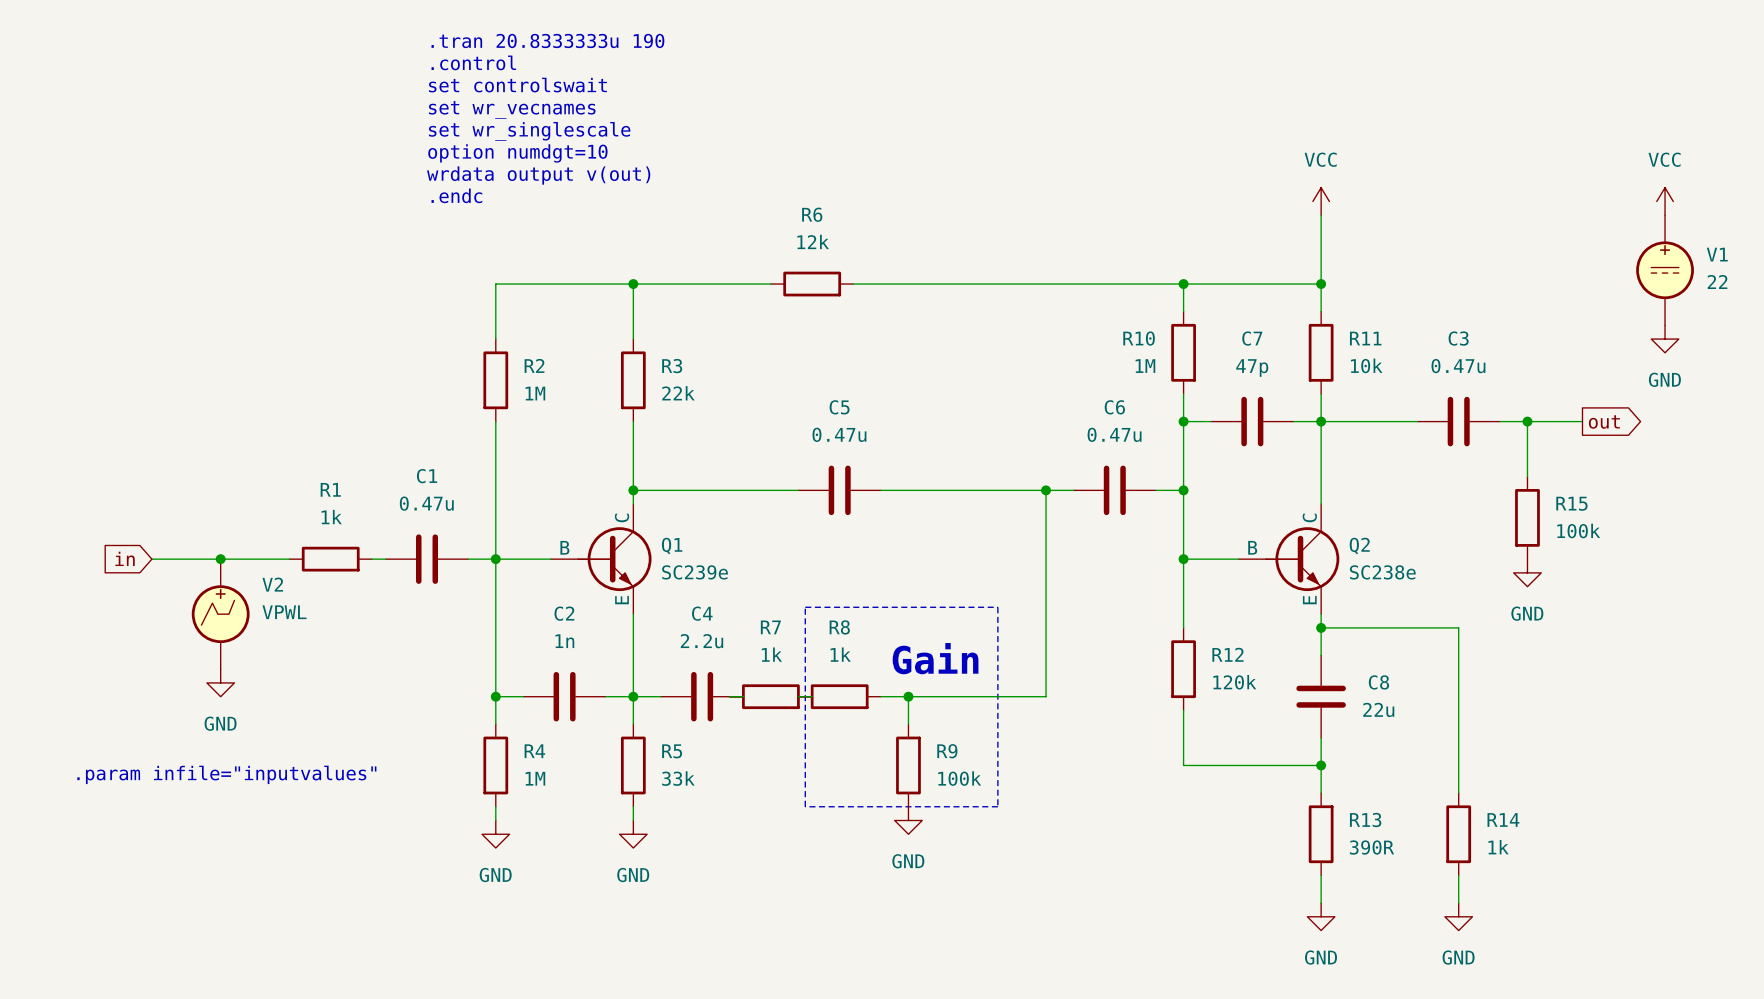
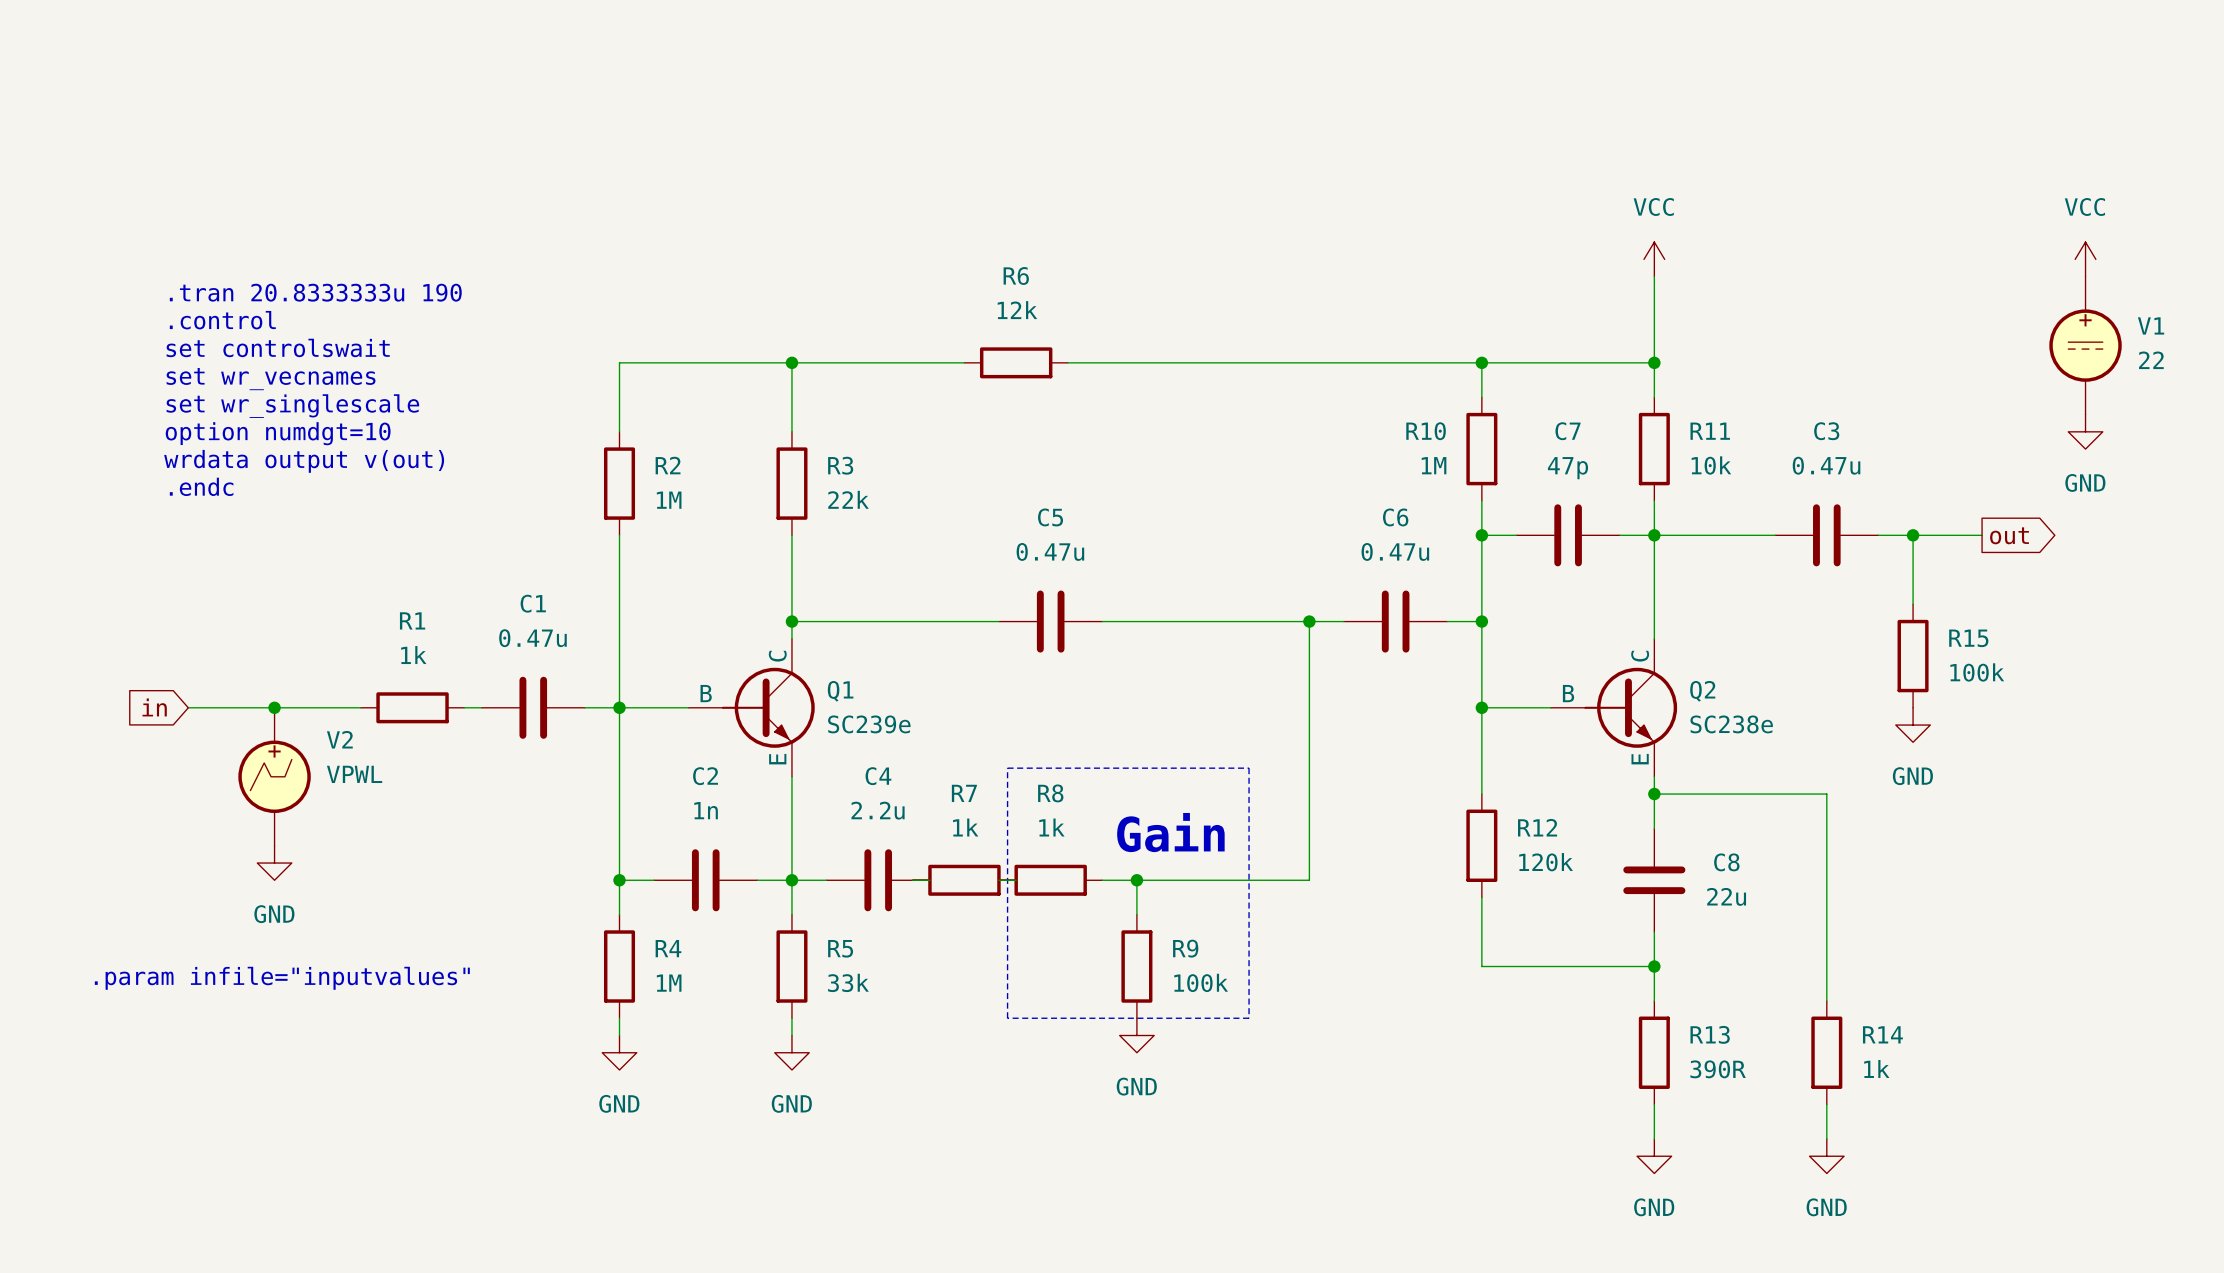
text: .tran 20.8333333u 190 (547, 40) -> none
text: .control (473, 62) -> none
text: set controlswait (517, 85) -> none
text: set wr_vecnames (512, 109) -> none
text: set wr_singlescale (529, 131) -> none
text: option numdgt=10 (517, 153) -> none
text: wrdata output v(out) (538, 175) -> none
text: .endc (456, 195) -> none
text: none -> .tran 20.8333333u 190 (315, 292)
text: none -> .control (222, 320)
text: none -> set controlswait (278, 347)
text: none -> set wr_vecnames (271, 379)
text: none -> set wr_singlescale (292, 406)
text: none -> option numdgt=10 (278, 433)
text: none -> wrdata output v(out) (304, 461)
text: none -> .endc (201, 486)

